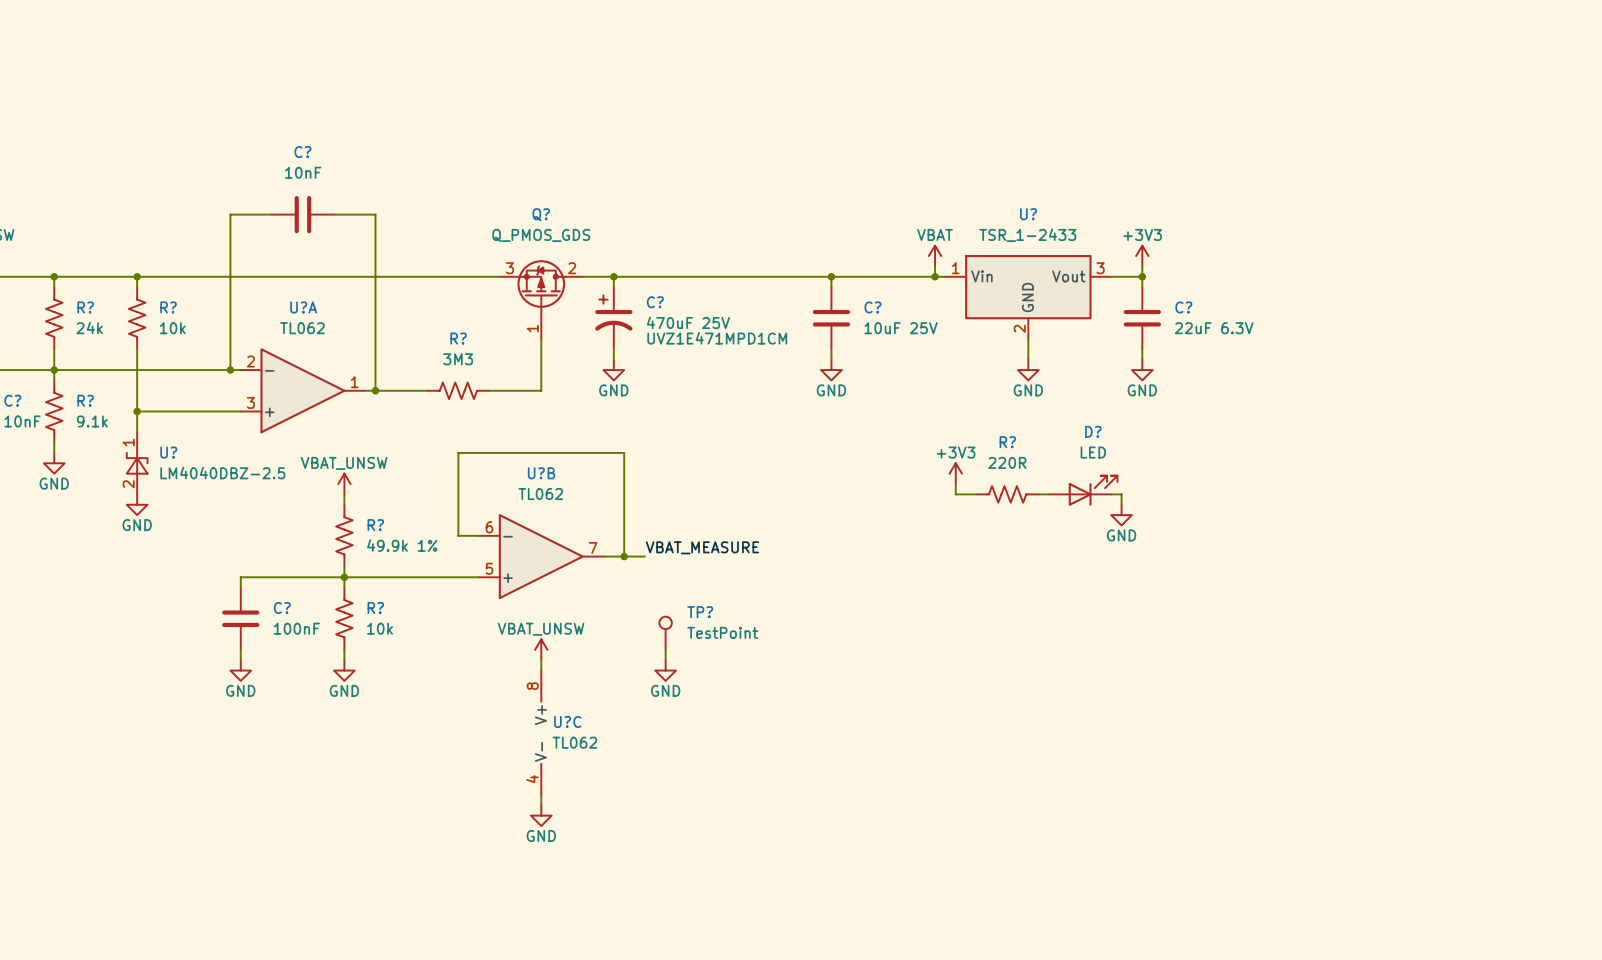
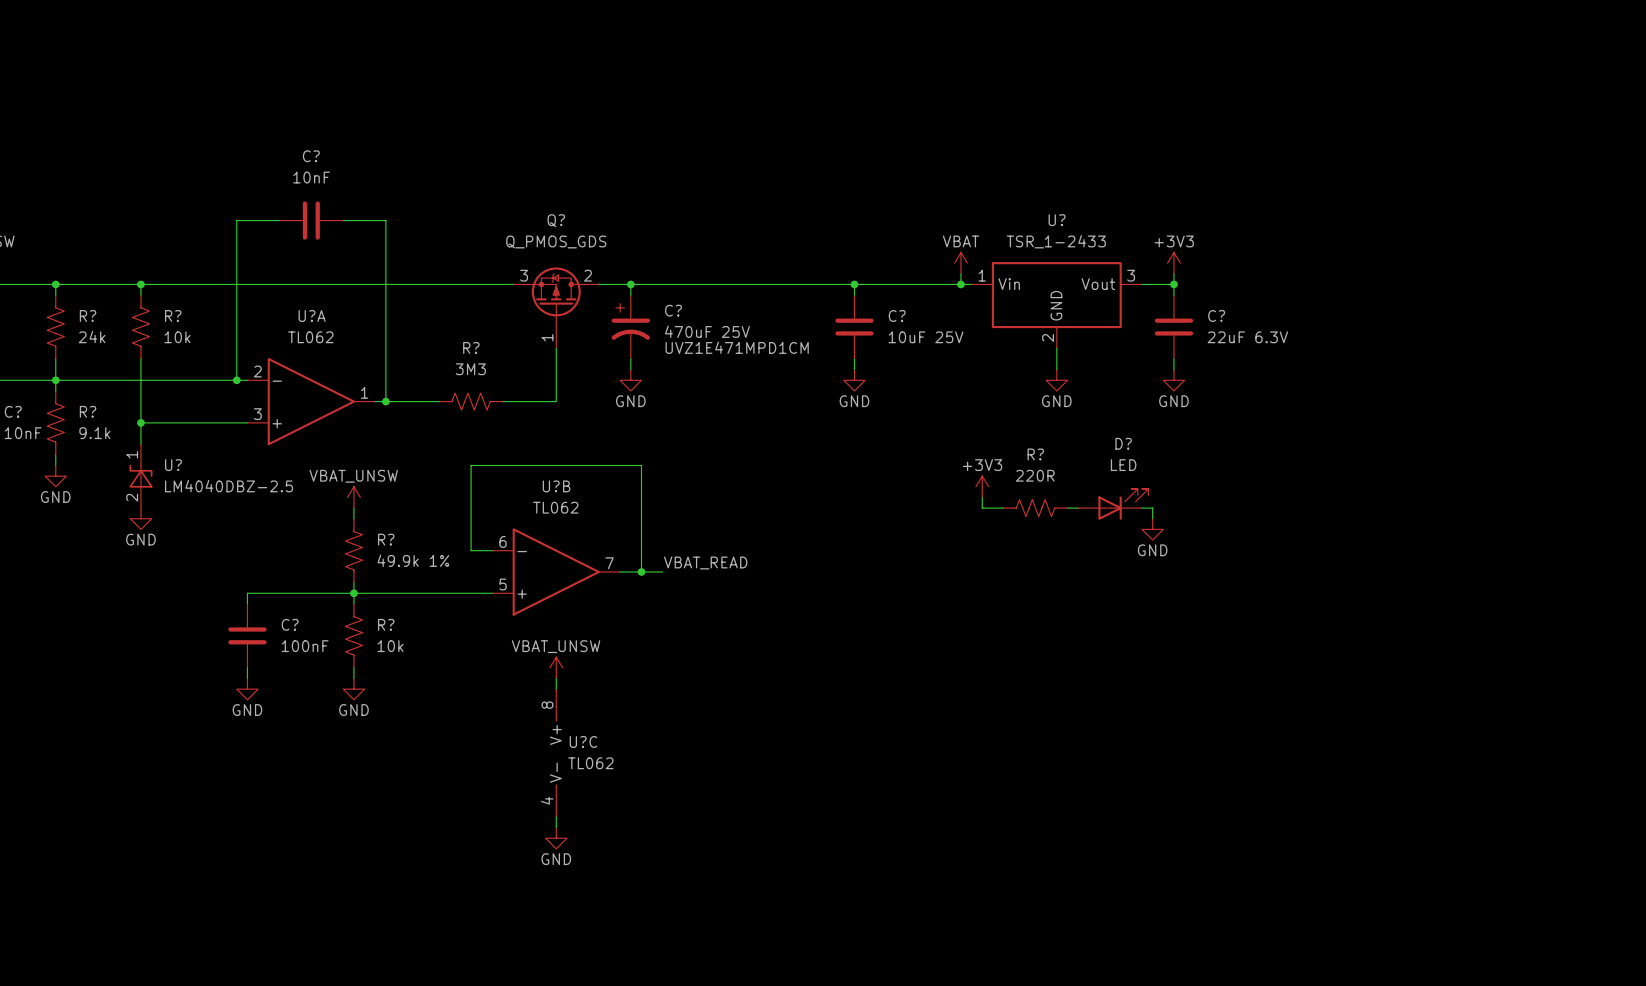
label: VBAT_MEASURE (702, 547) -> VBAT_READ (705, 562)
TP?: TestPoint (665, 633) -> none
wire: (665, 649) (665, 660) -> none
power symbol: GND (665, 670) -> none

